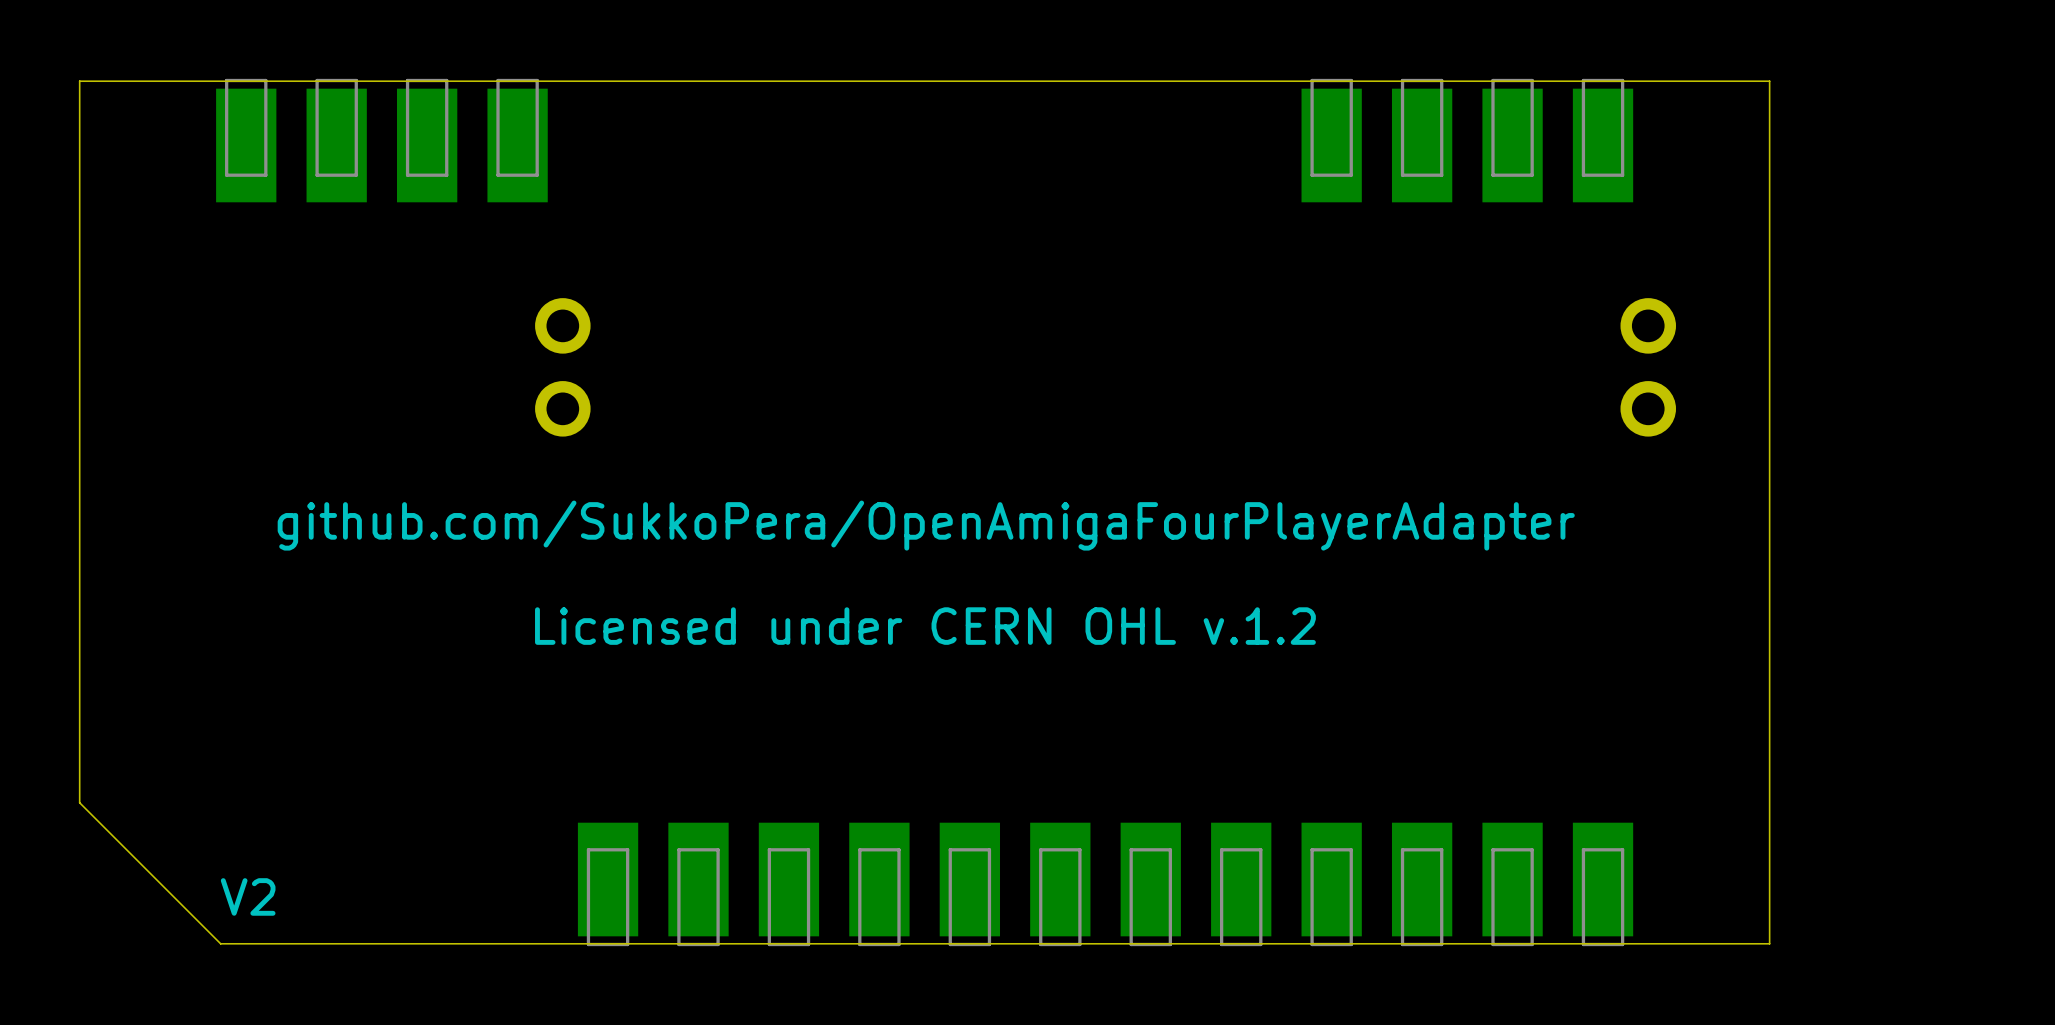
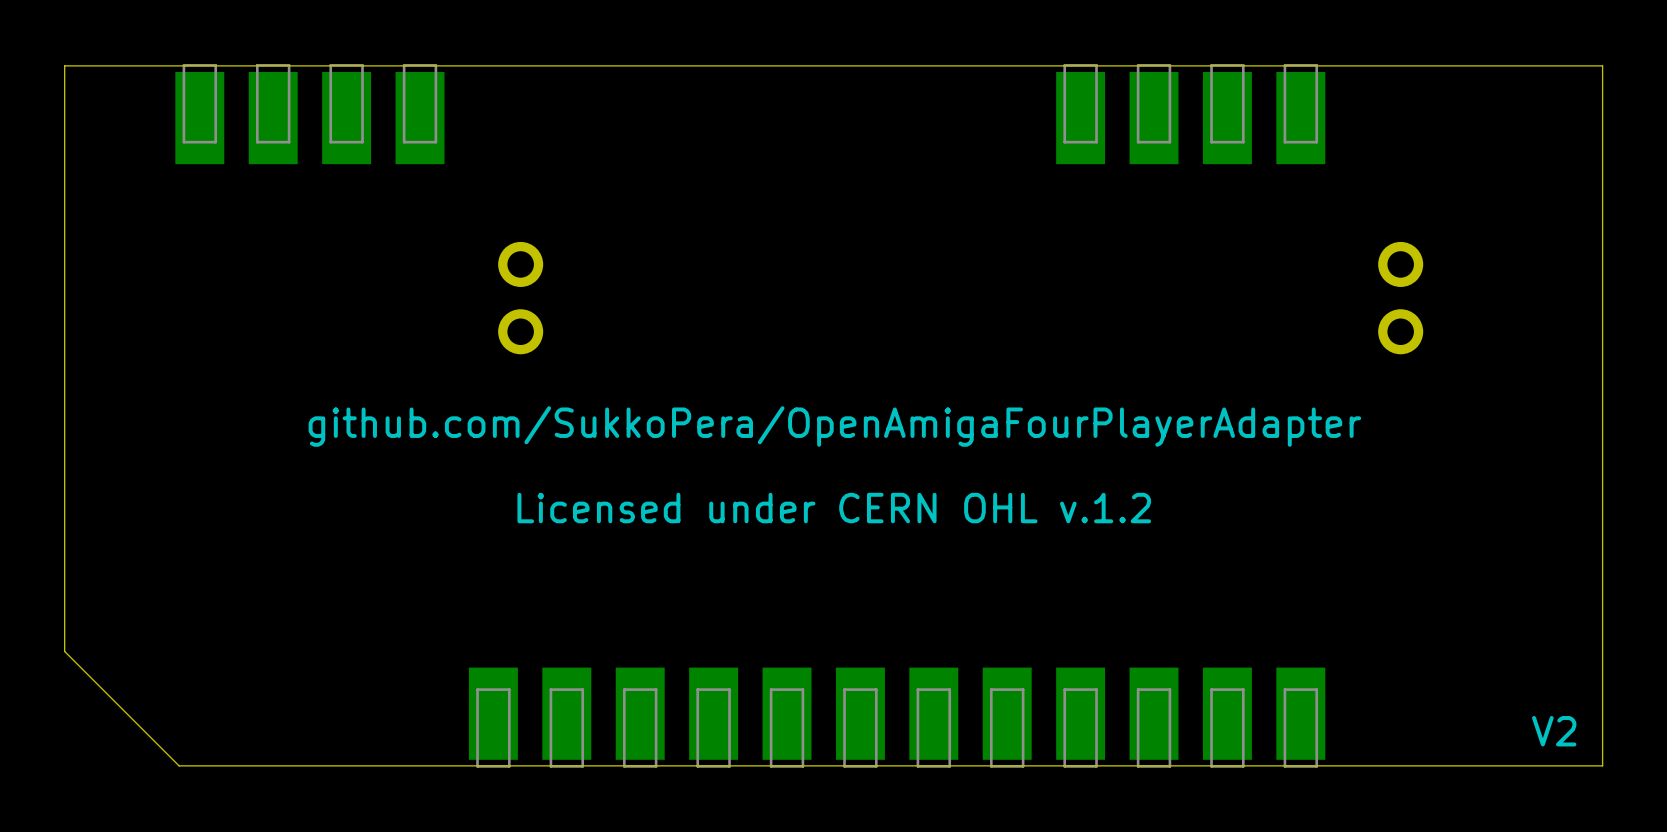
board edge: (1769, 81) (1769, 943) -> (1436, 65) (1602, 65) (1602, 765) (1436, 765)
part position: (562, 367) -> (520, 298)
part position: (1648, 367) -> (1400, 298)
text position: github.com/SukkoPera/OpenAmigaFourPlayerAdapter (926, 525) -> github.com/SukkoPera/OpenAmigaFourPlayerAdapter (834, 426)
text position: Licensed under CERN OHL v.1.2 (925, 626) -> Licensed under CERN OHL v.1.2 (834, 508)
text: V2 (248, 896) -> none
text: none -> V2 (1554, 731)

